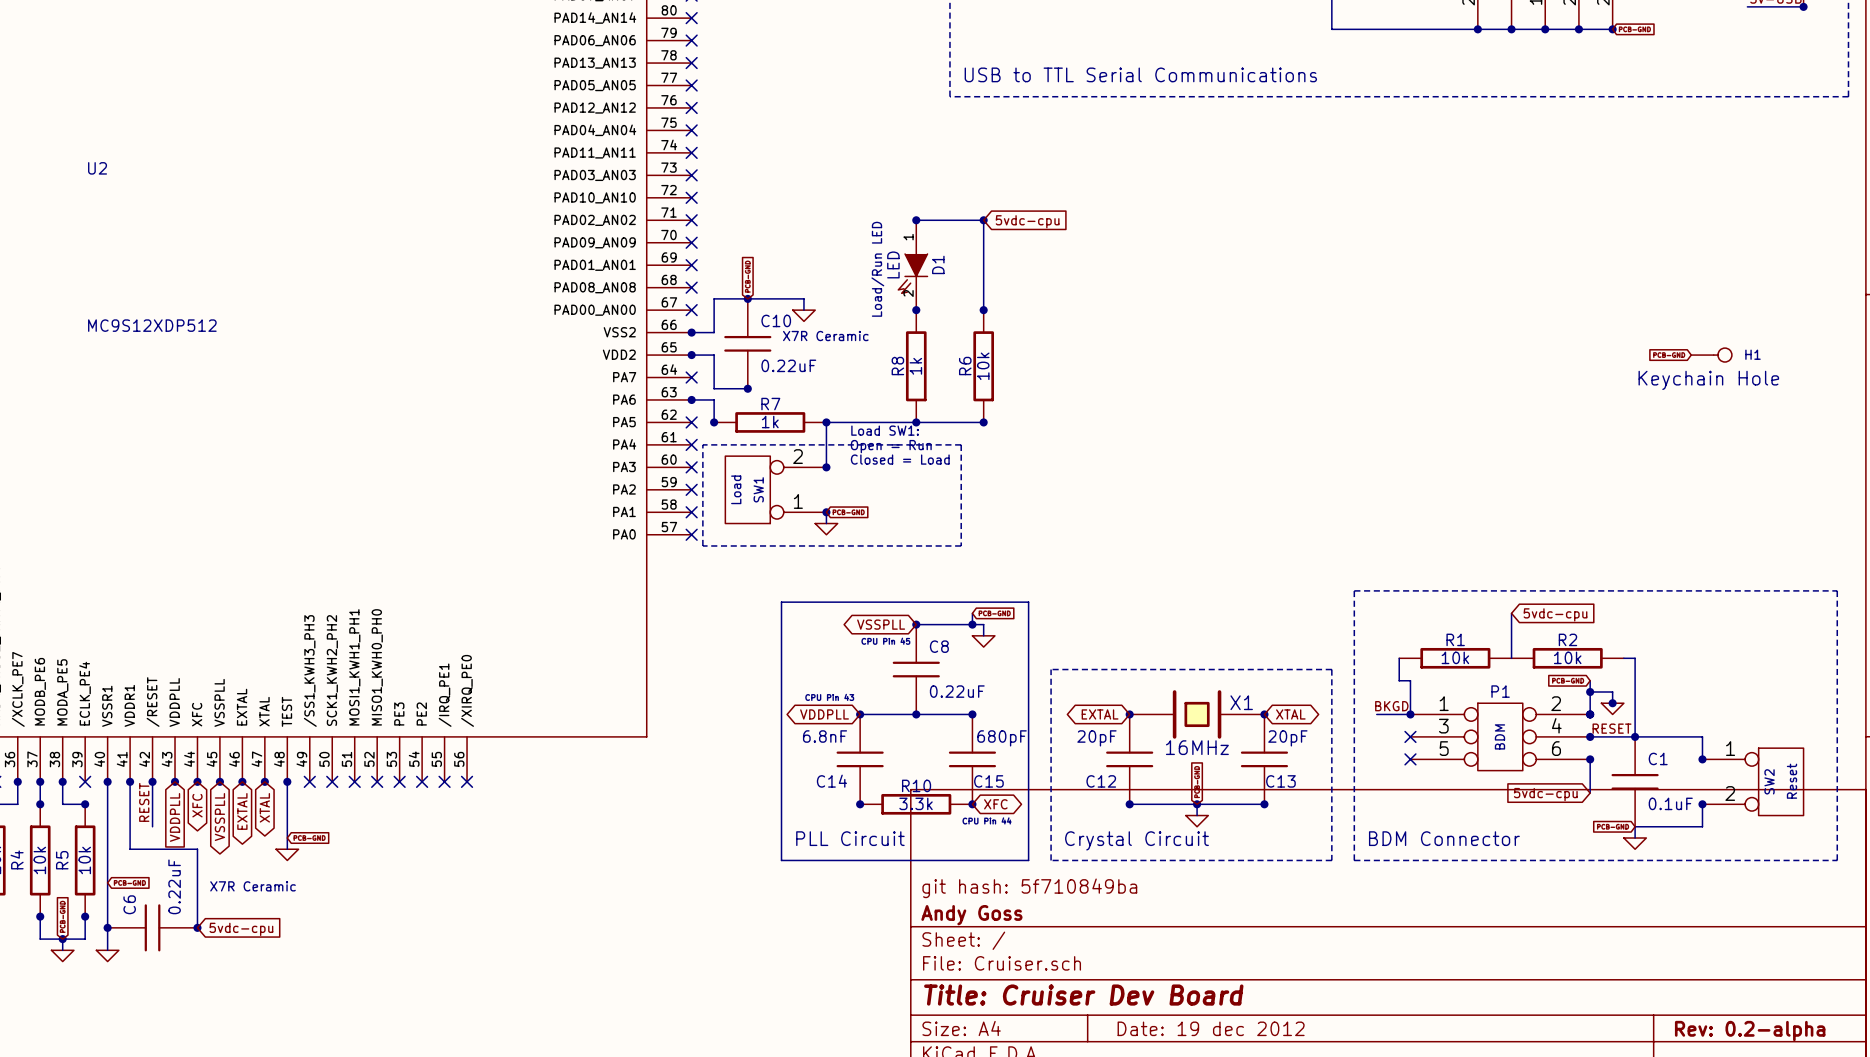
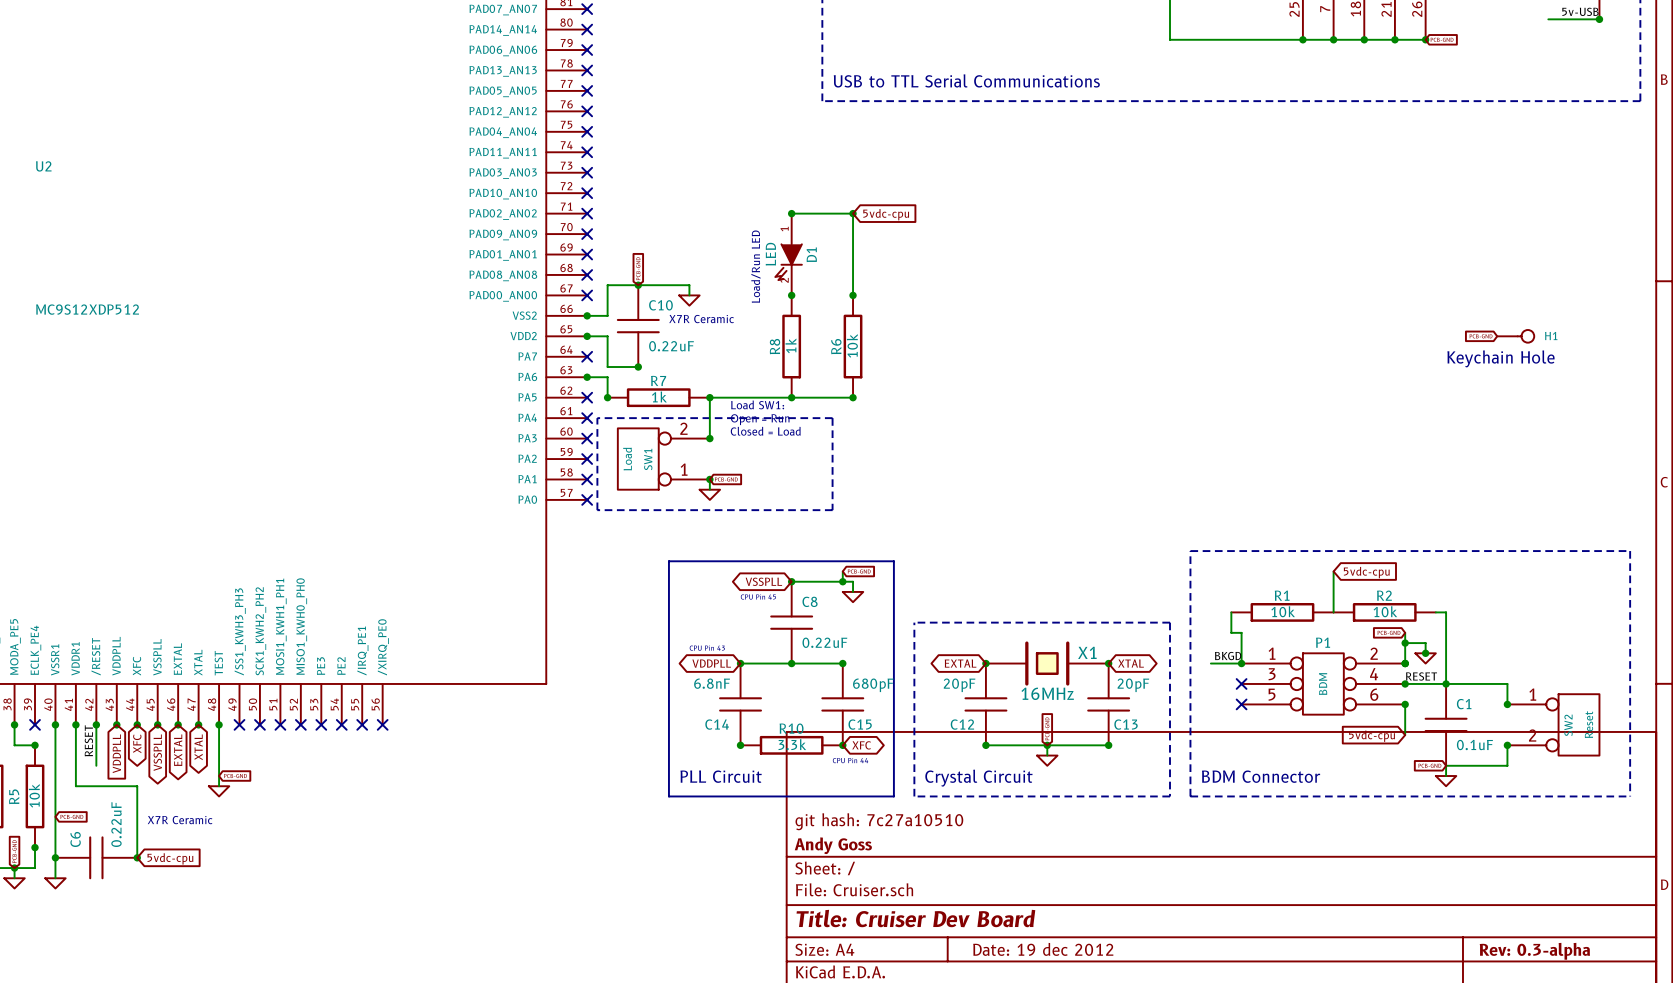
title block: git hash: 5f710849ba (1029, 888) -> git hash: 7c27a10510 (879, 821)
title block: Rev: 0.2-alpha (1750, 1031) -> Rev: 0.3-alpha (1534, 951)

